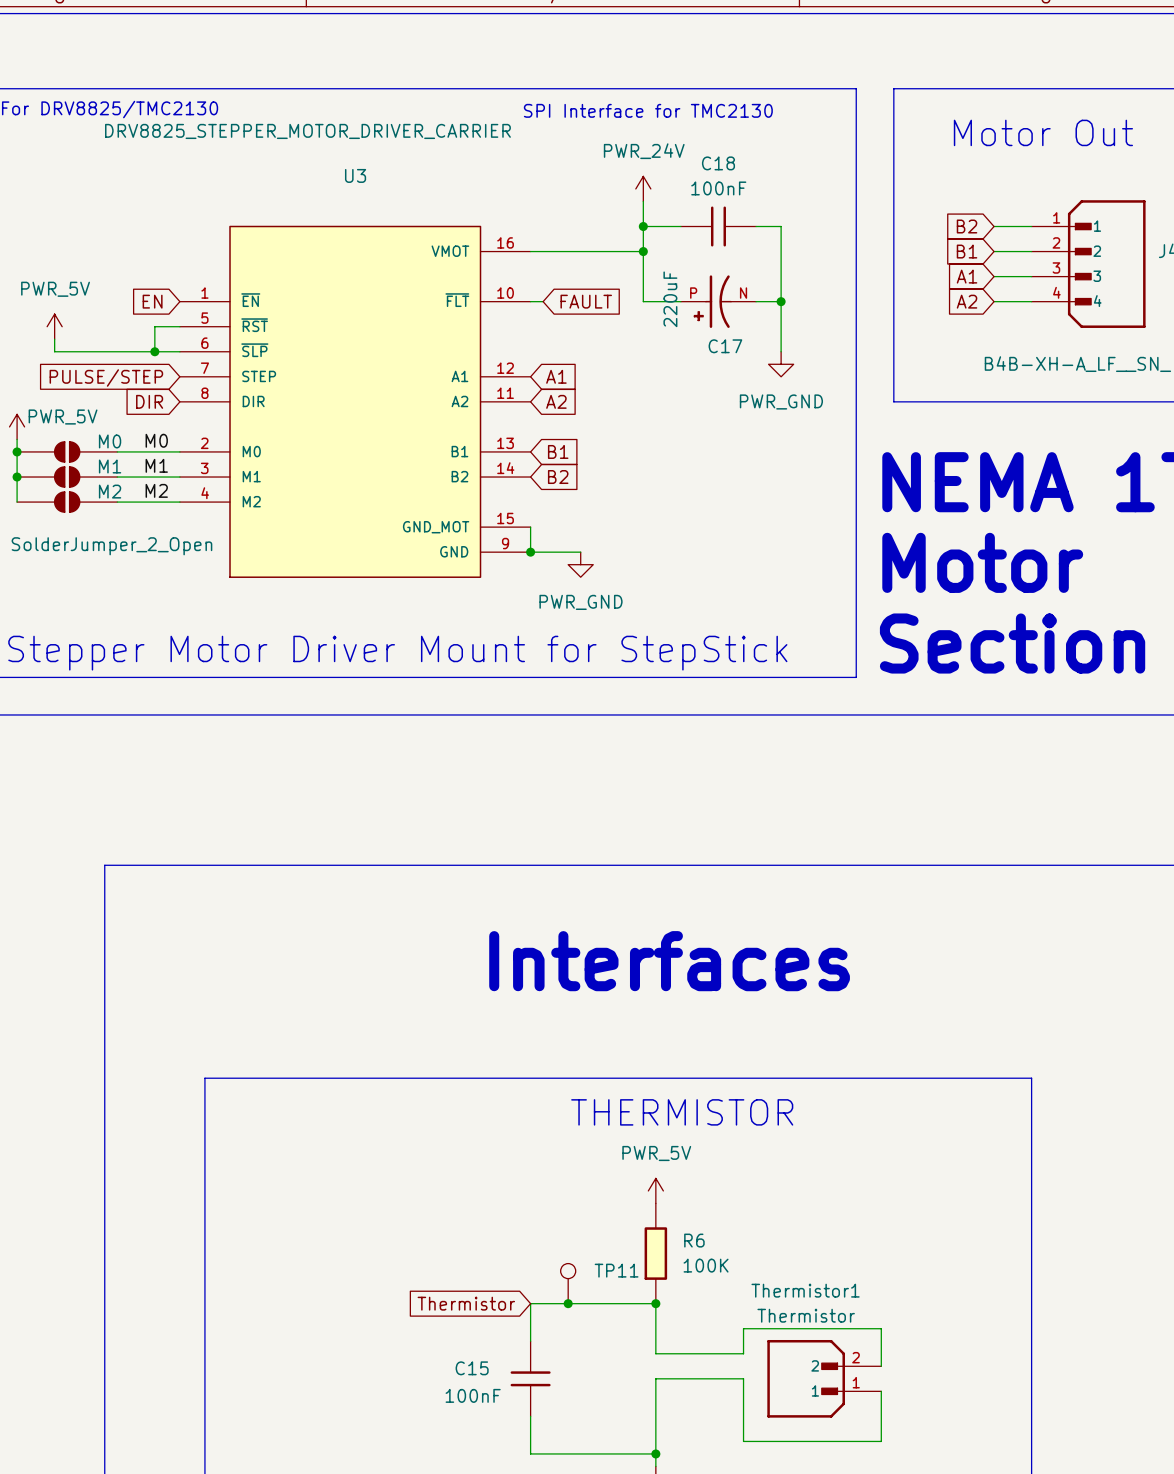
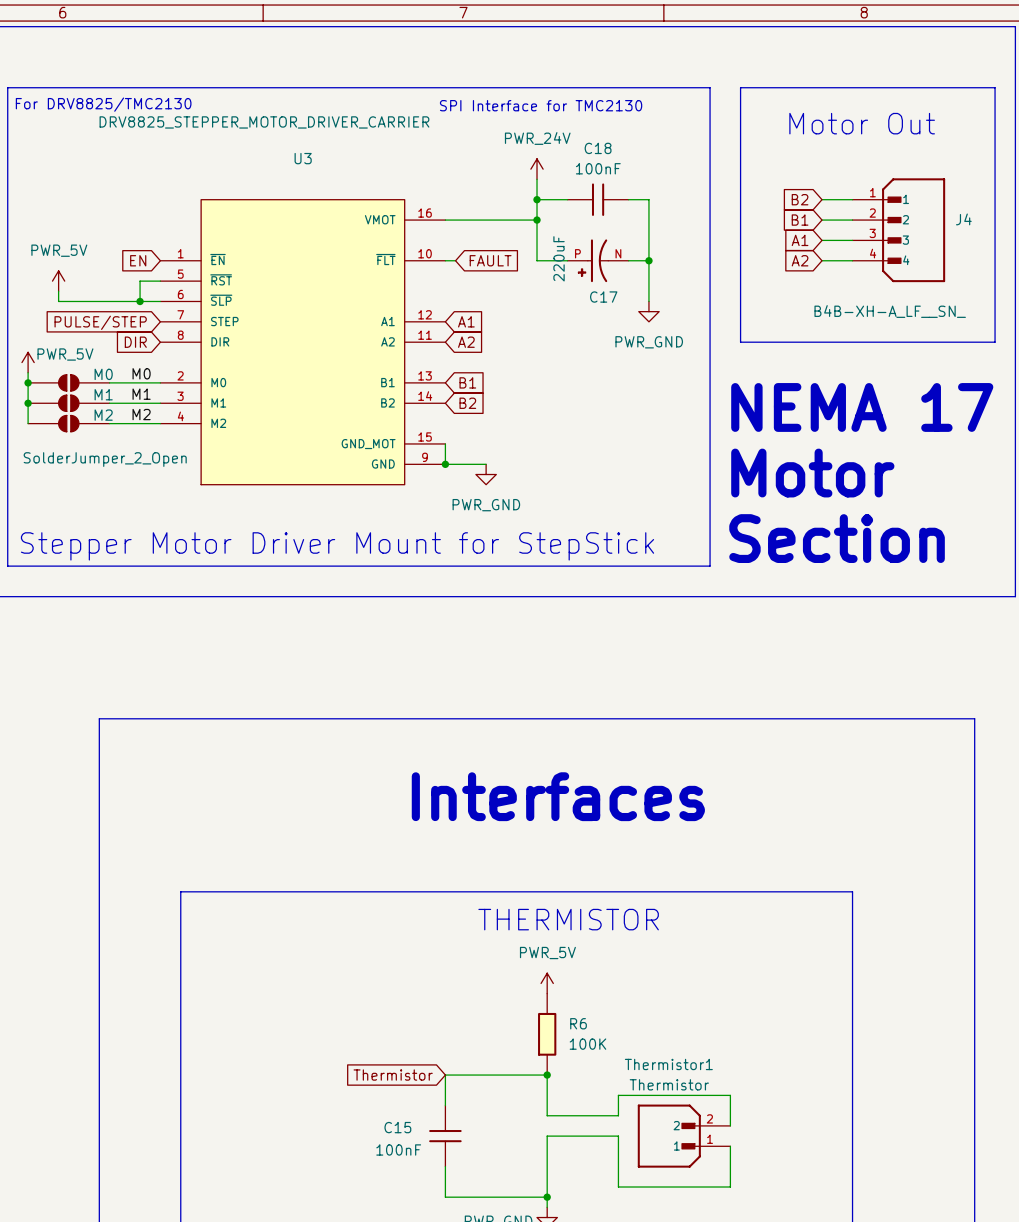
TP11: (568, 1283) -> none
junction: (568, 1303) -> none

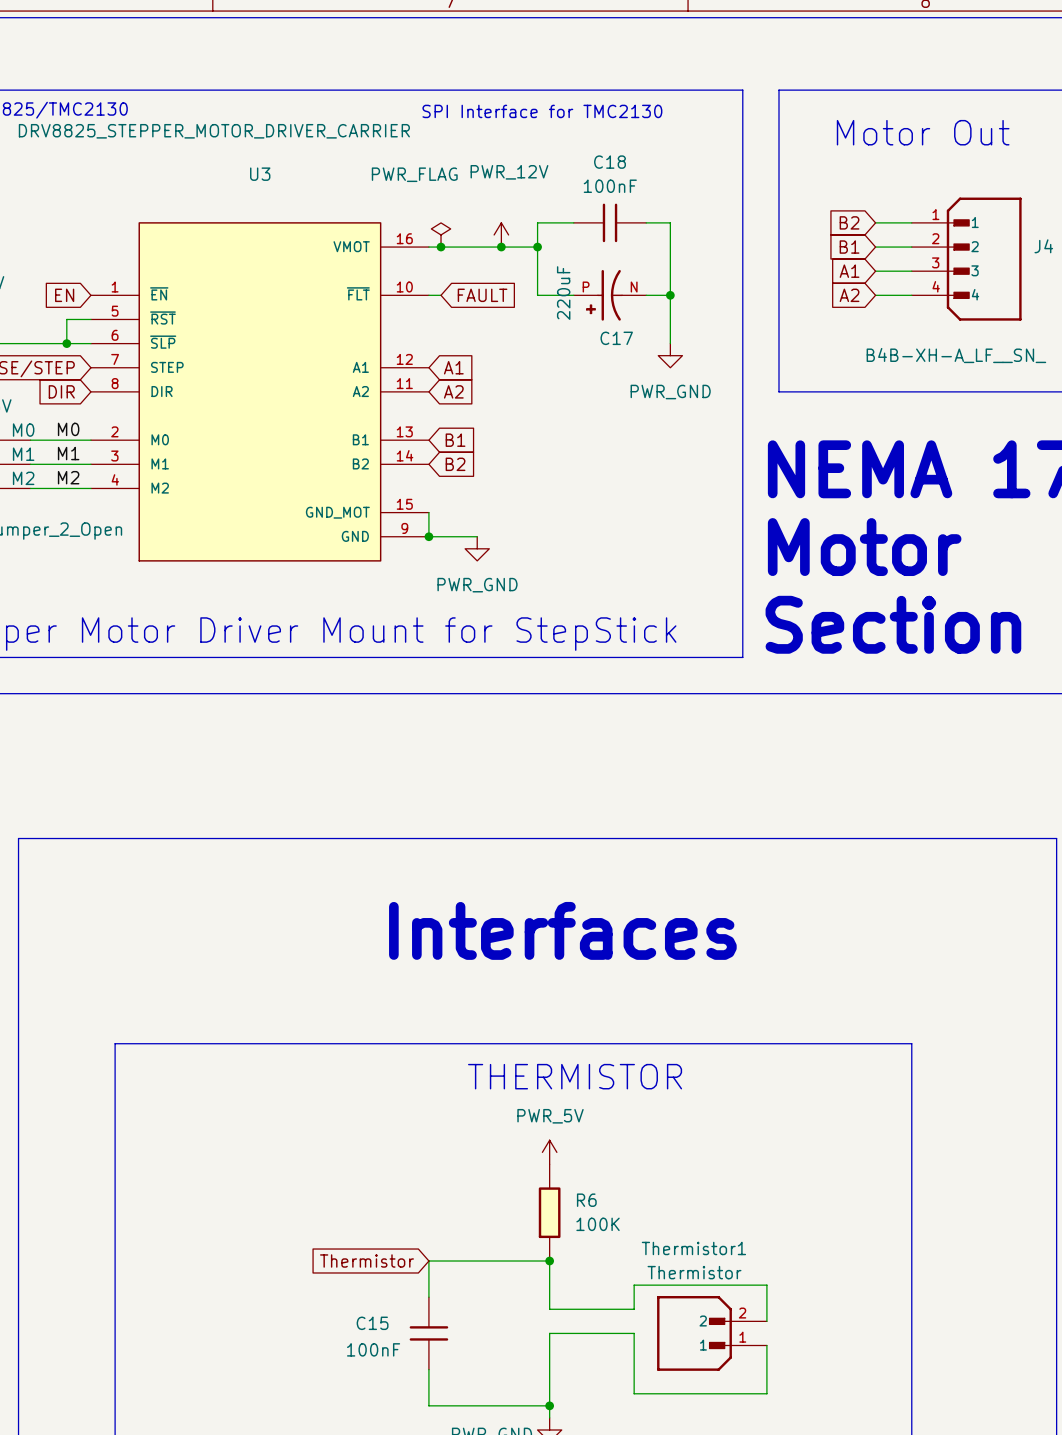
power symbol: PWR_24V (537, 169) -> none
wire: (537, 179) (537, 199) -> none
junction position: (537, 199) -> (501, 247)
power symbol: none -> PWR_FLAG (441, 234)
power symbol: none -> PWR_12V (501, 234)
junction: none -> (441, 247)

